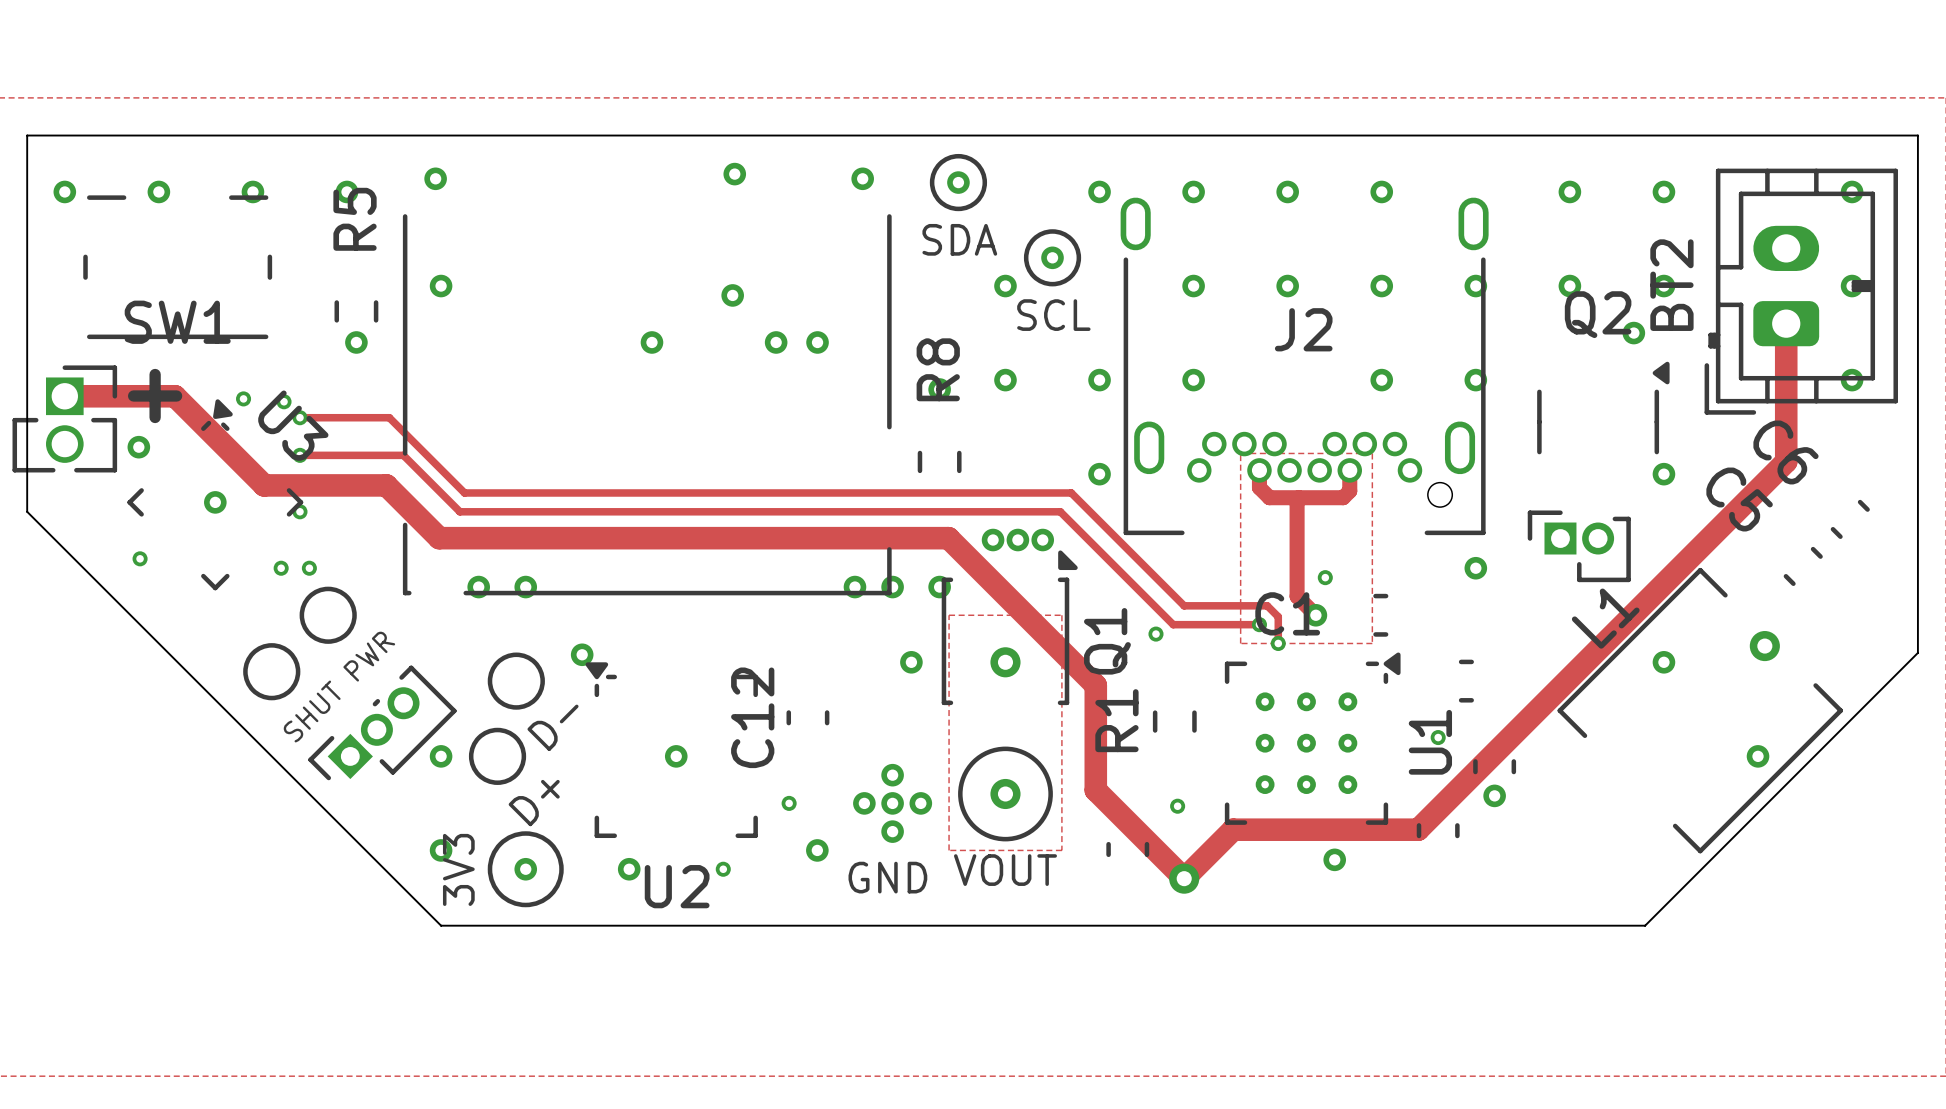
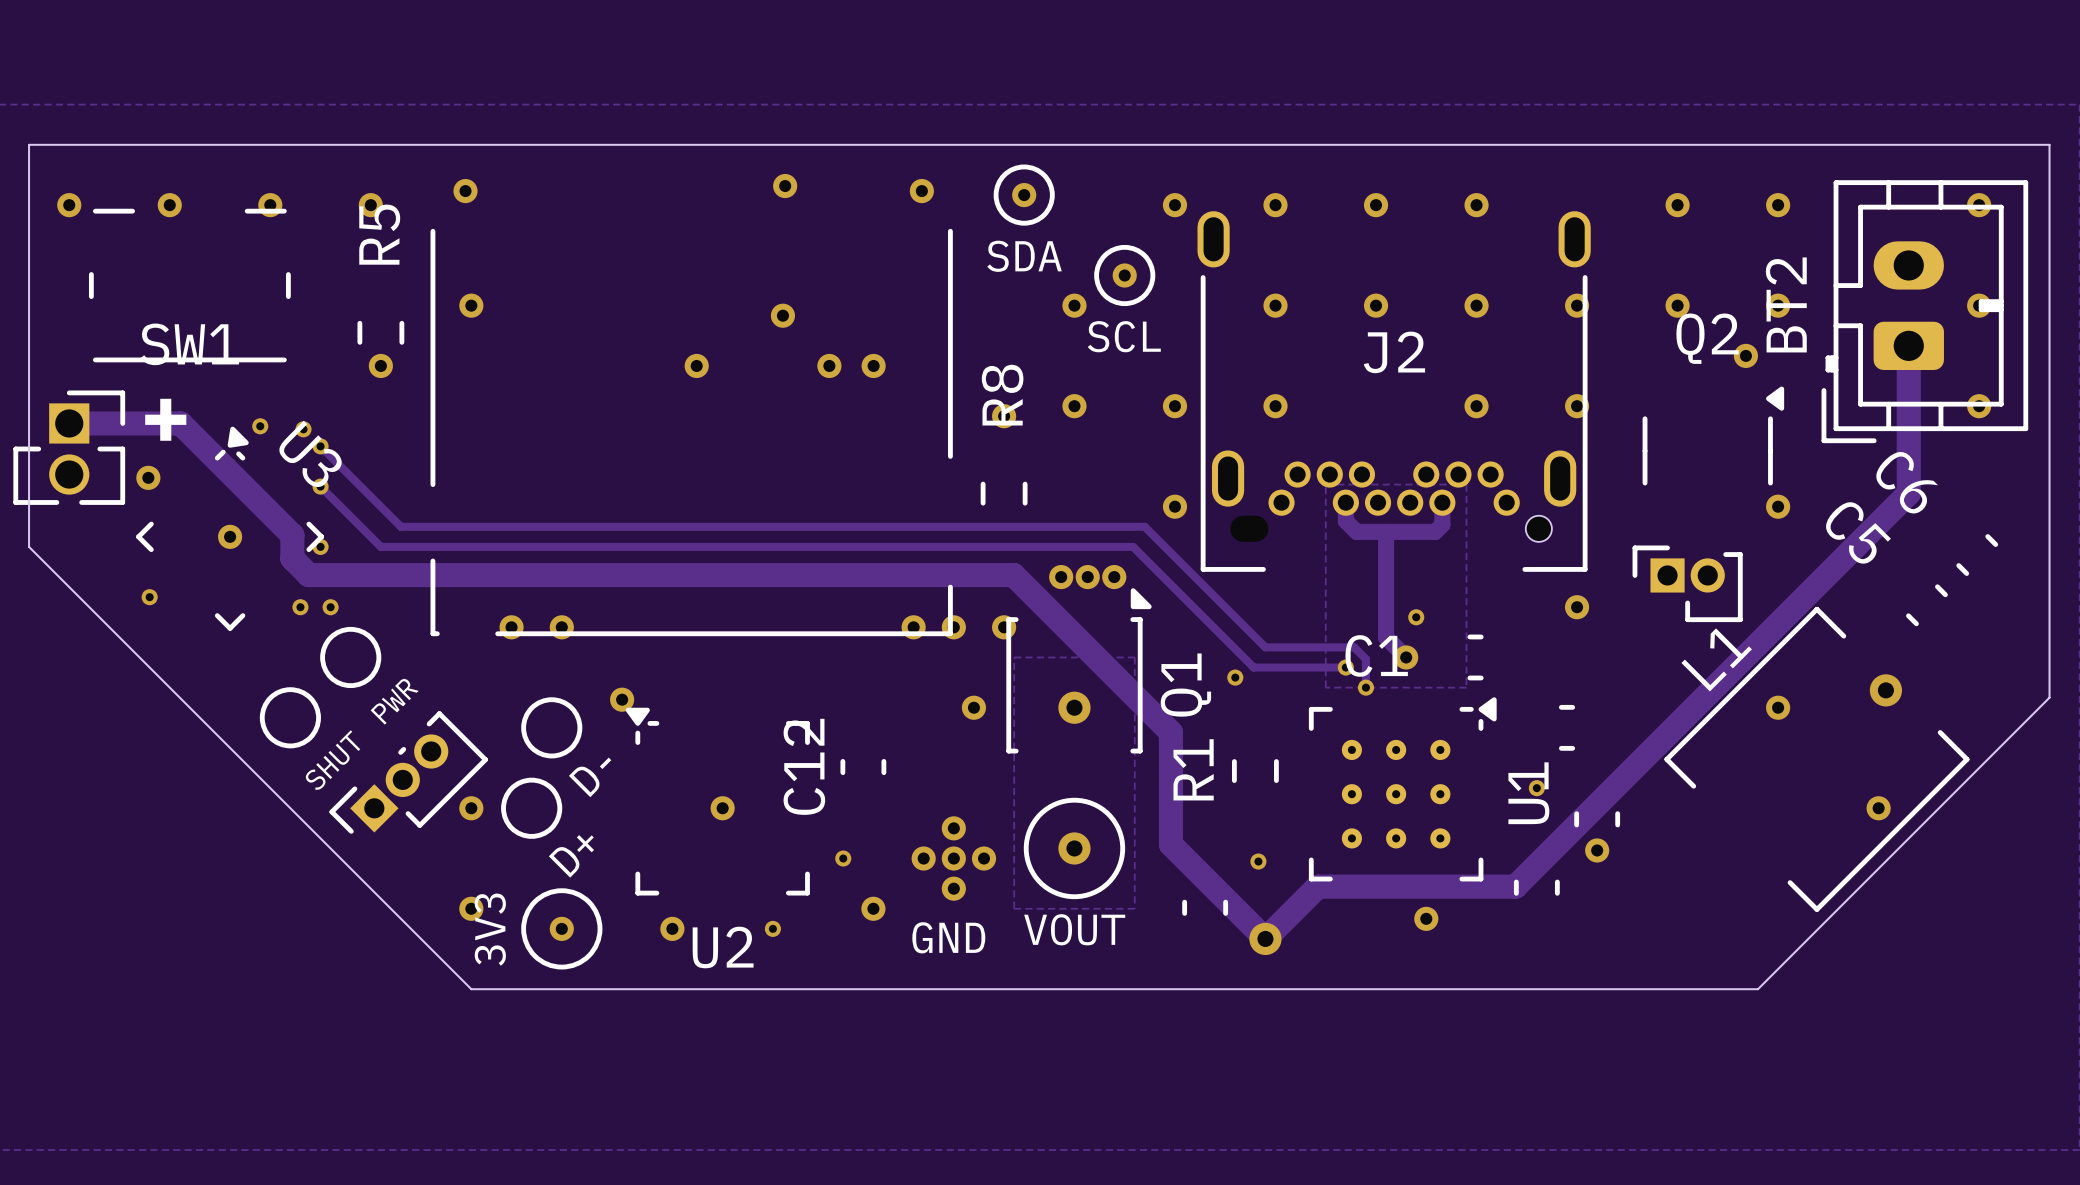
track: (169, 396) (175, 396) (264, 485) (386, 485) (439, 538) -> (180, 423) (292, 535) (292, 558) (308, 575) (469, 575)
track: (299, 417) (389, 417) (464, 492) -> (320, 446) (400, 526) (496, 526)
track: (299, 455) (403, 455) (459, 511) -> (320, 486) (380, 546) (491, 546)

